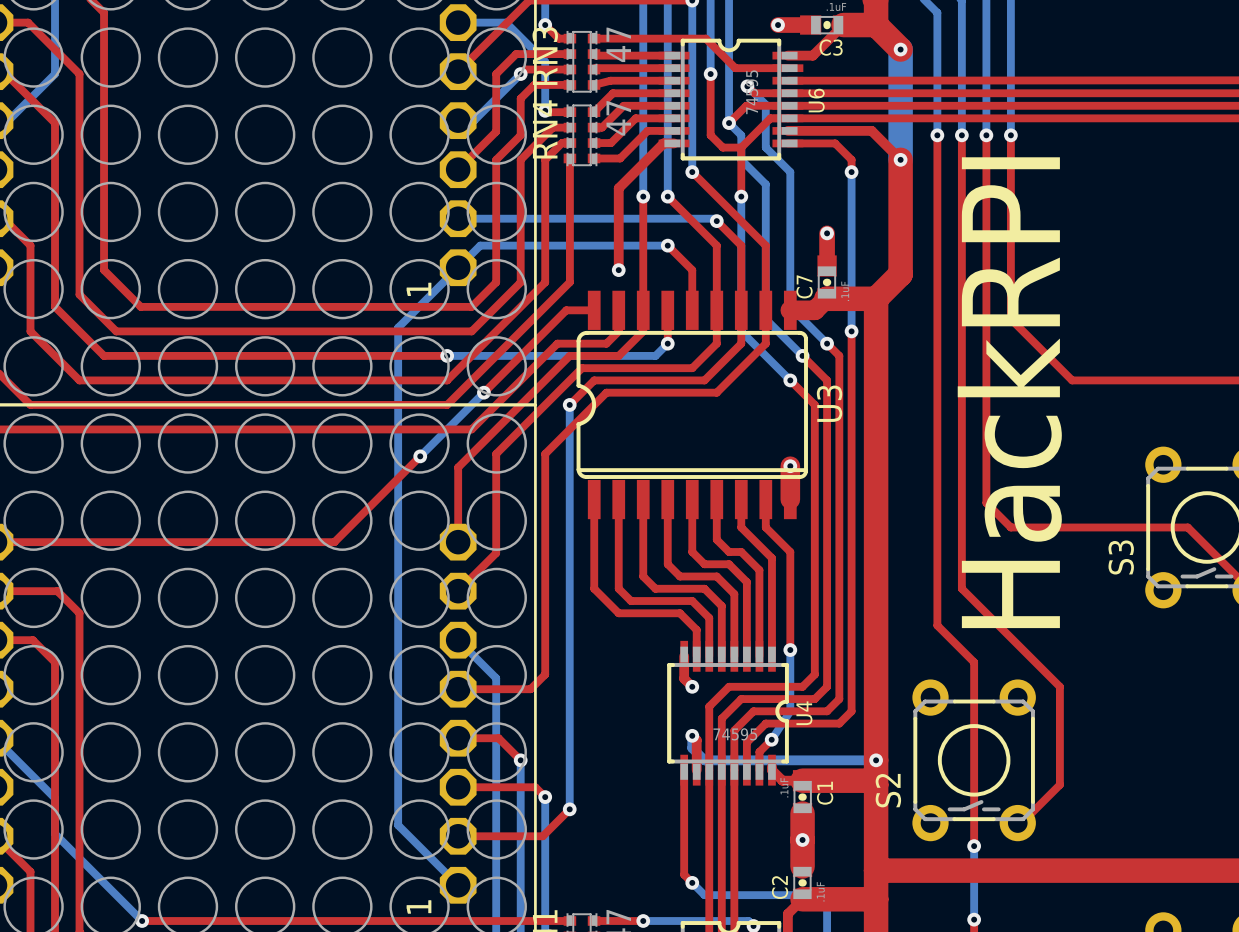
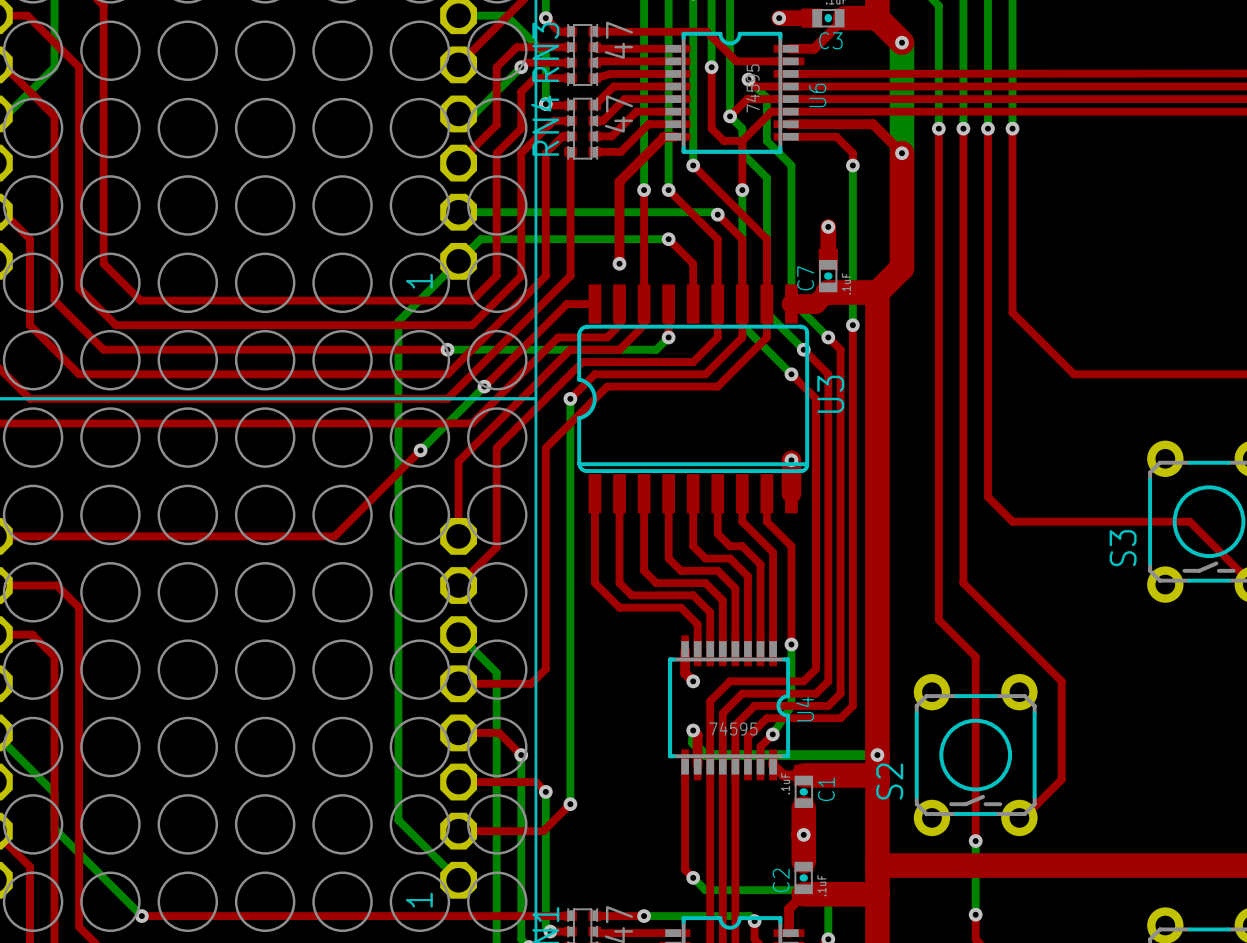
text: HackRPI (1009, 392) -> none

